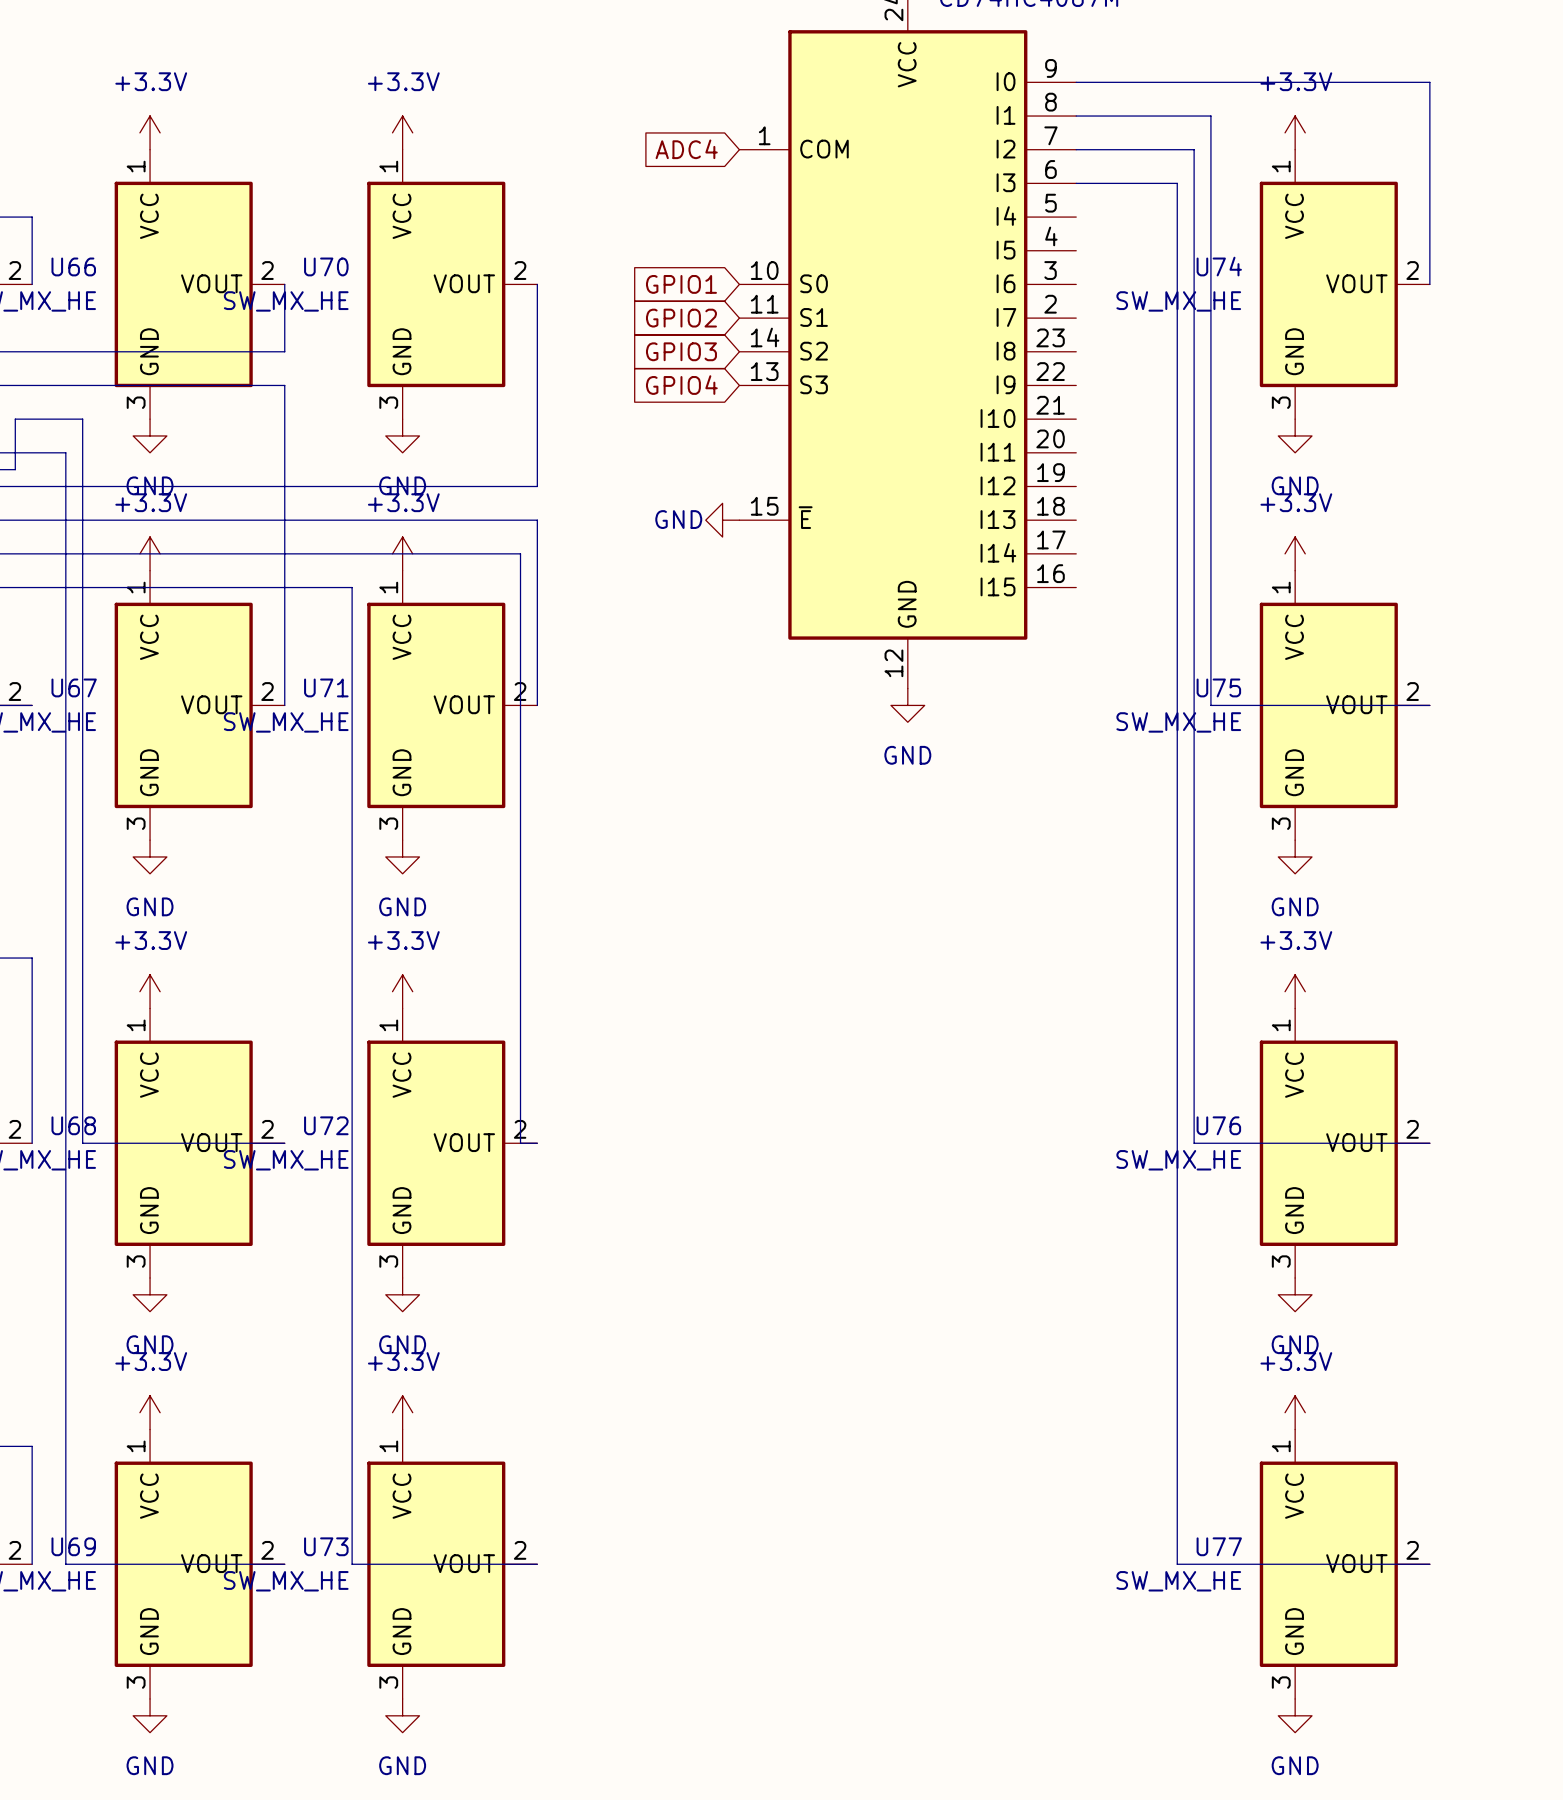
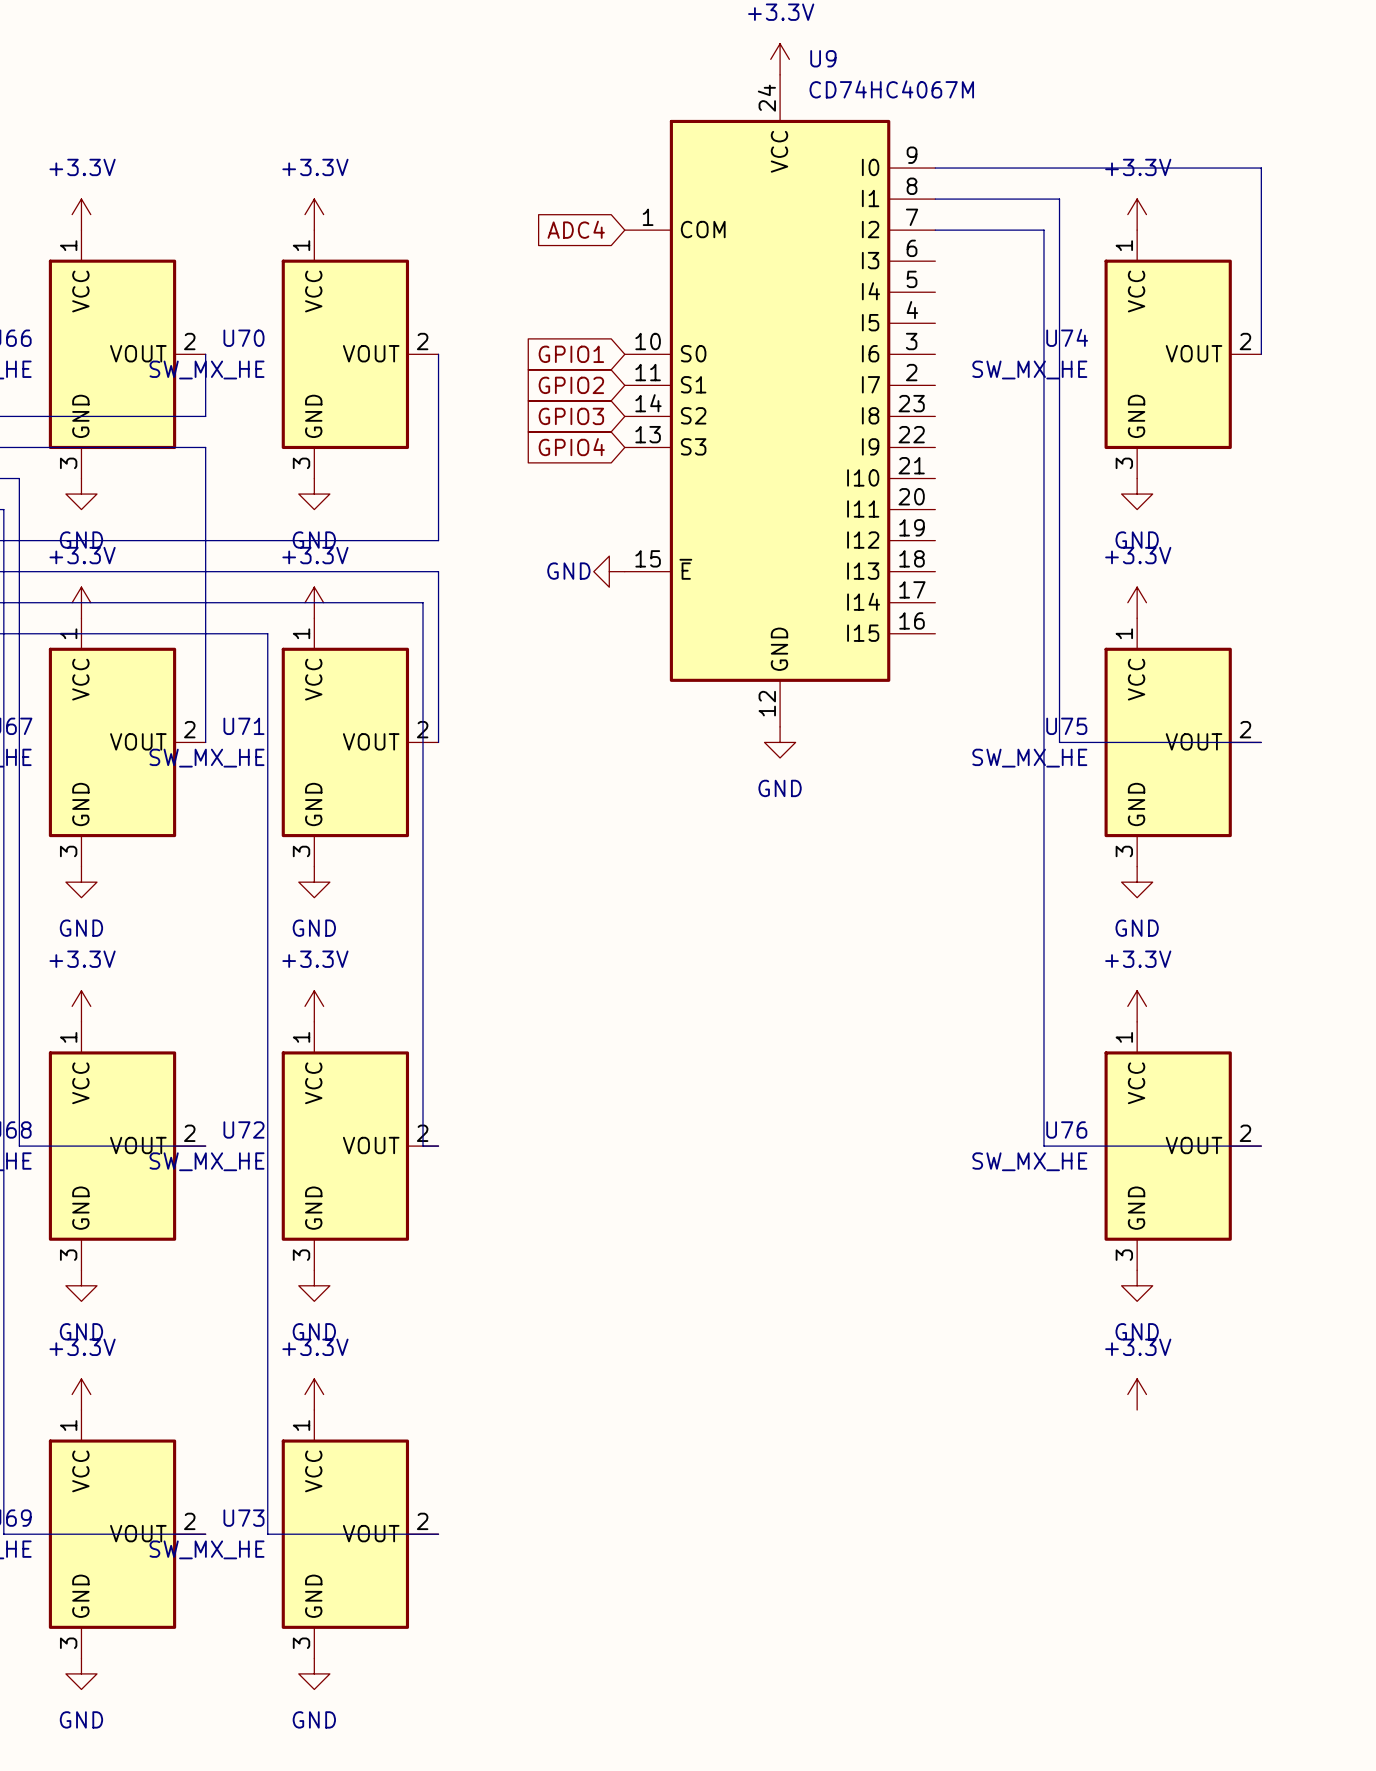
wire: (1076, 183) (1177, 183) (1177, 1564) (1429, 1564) -> none
U77: SW_MX_HE (1344, 1564) -> none
power symbol: GND (1295, 1715) -> none

